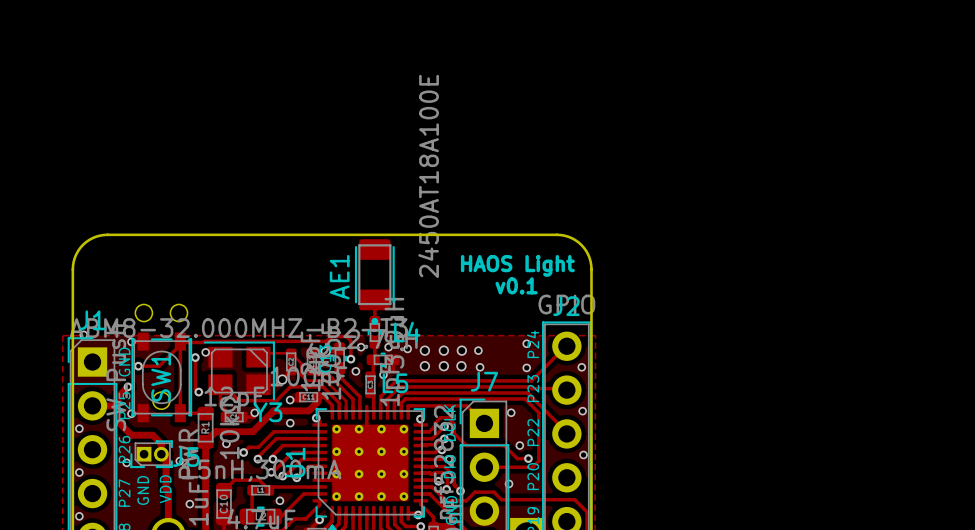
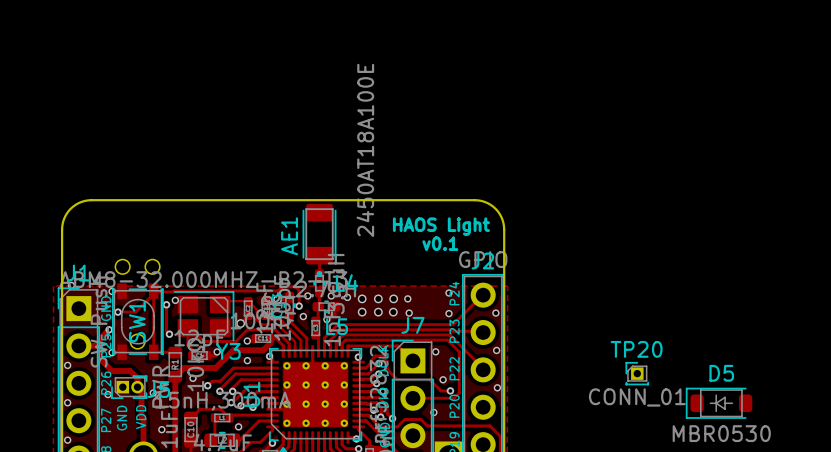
TP20: none -> CONN_01 (637, 373)
D5: none -> MBR0530 (719, 403)

